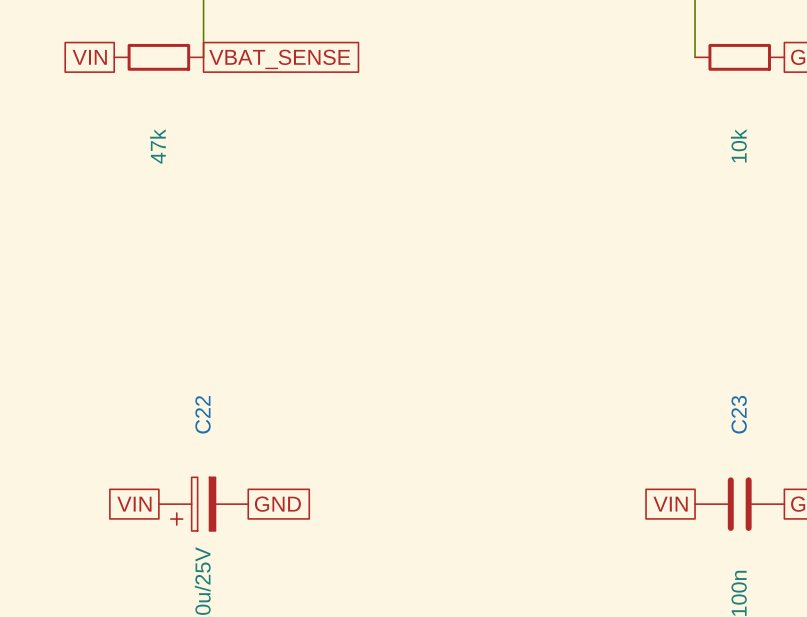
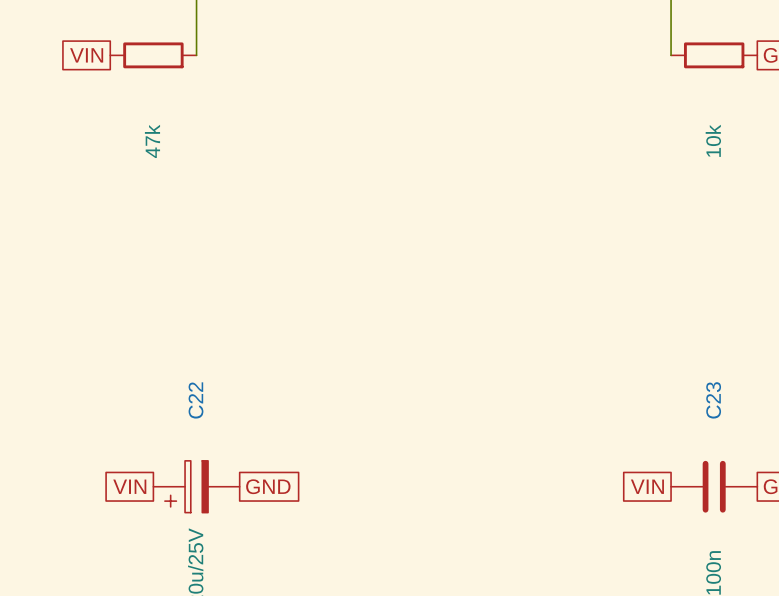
global label: VBAT_SENSE (279, 59) -> none

